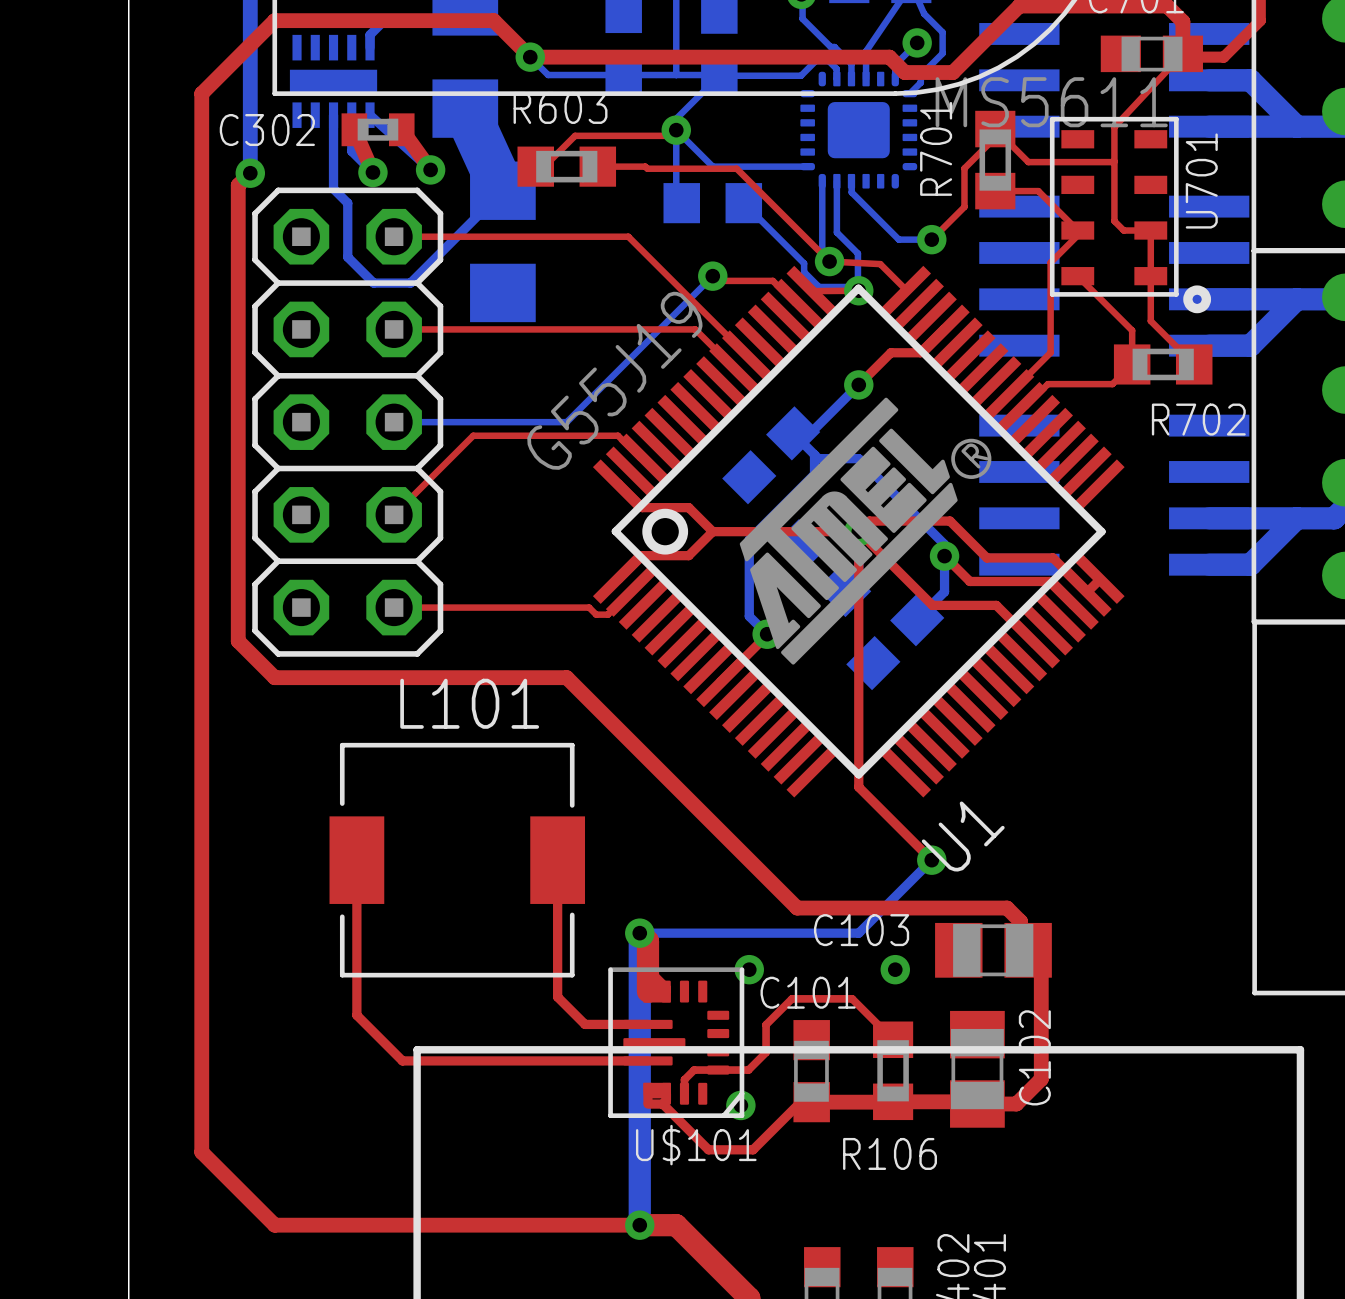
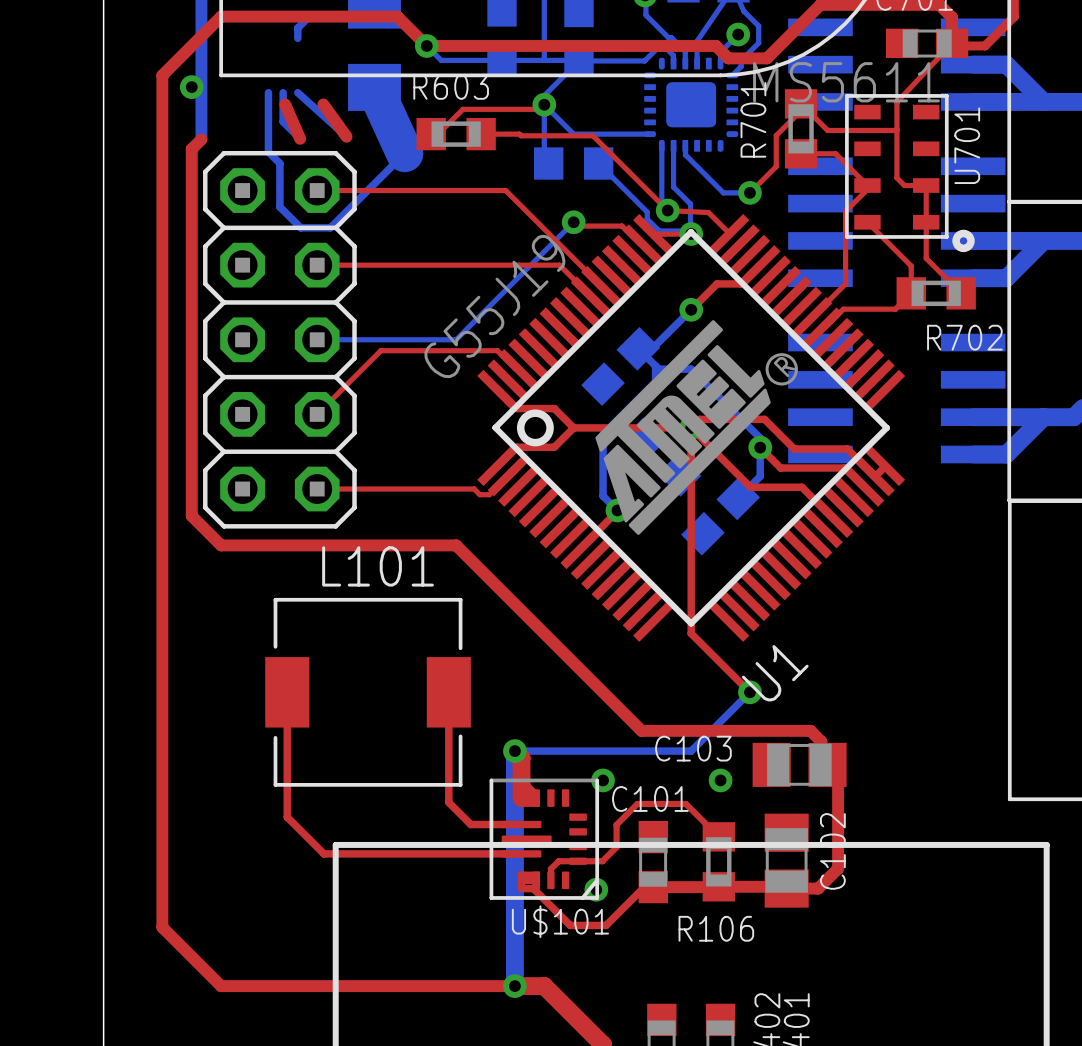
part: (333, 81) -> none
C302: (378, 129) -> none
via: (430, 169) -> none
via: (372, 172) -> none
via position: (250, 173) -> (191, 87)
part: (502, 241) -> none

